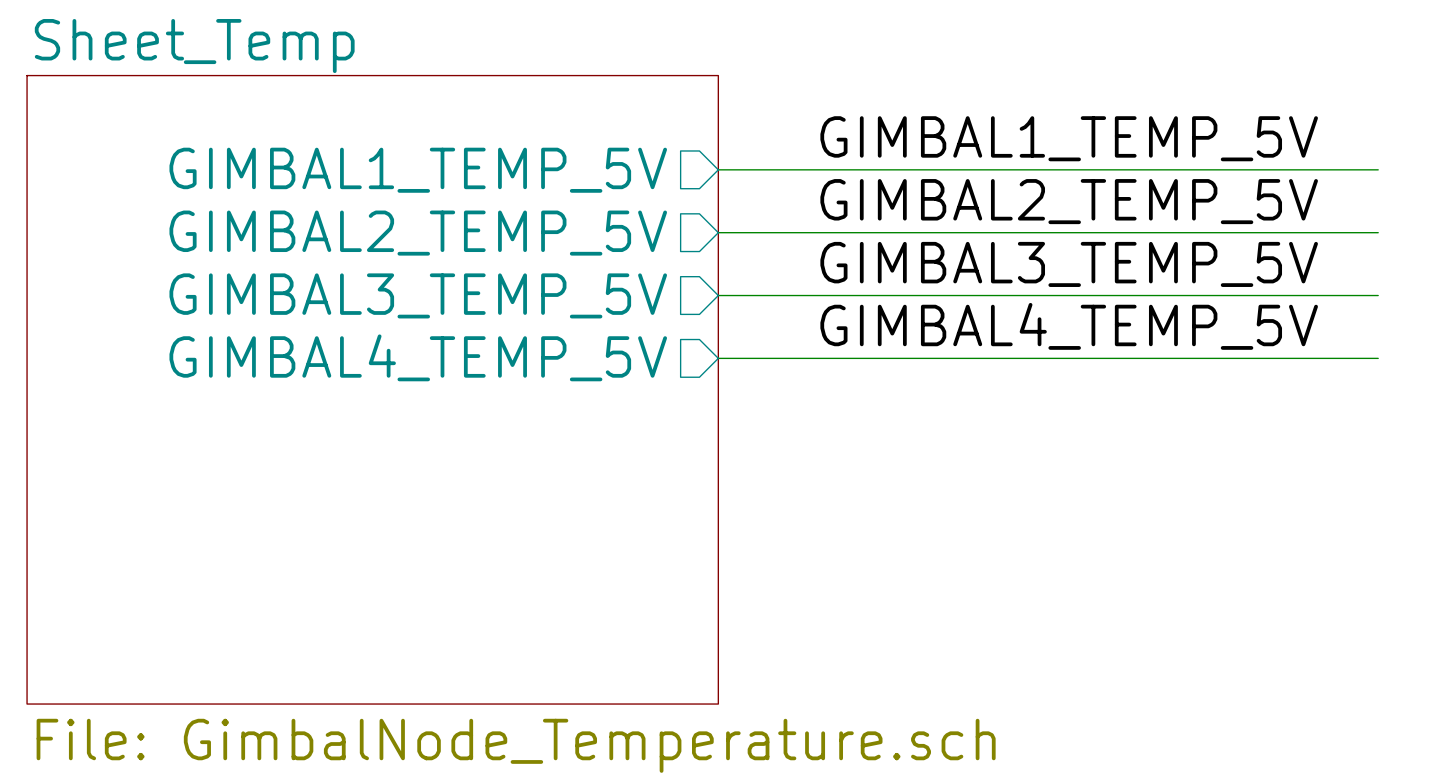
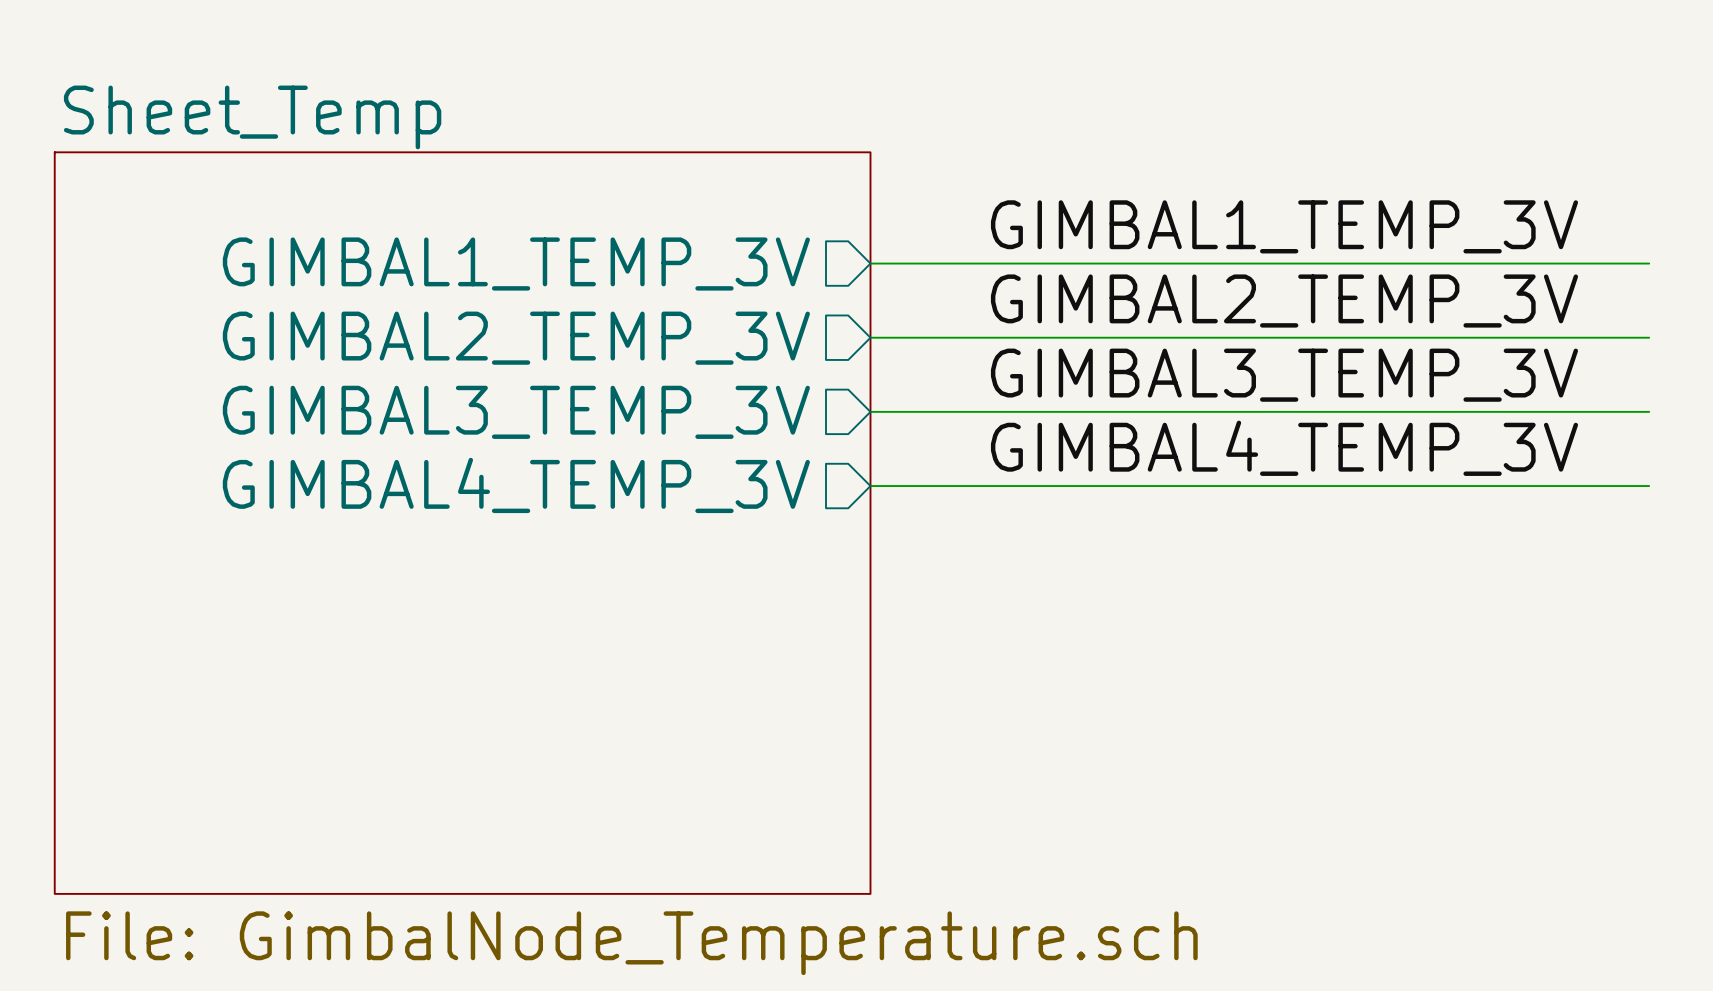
label: GIMBAL1_TEMP_5V (1069, 138) -> GIMBAL1_TEMP_3V (1284, 226)
sheet pin: GIMBAL1_TEMP_5V (418, 170) -> GIMBAL1_TEMP_3V (516, 264)
label: GIMBAL2_TEMP_5V (1069, 201) -> GIMBAL2_TEMP_3V (1284, 301)
sheet pin: GIMBAL2_TEMP_5V (418, 233) -> GIMBAL2_TEMP_3V (516, 338)
label: GIMBAL3_TEMP_5V (1069, 264) -> GIMBAL3_TEMP_3V (1284, 375)
sheet pin: GIMBAL3_TEMP_5V (418, 295) -> GIMBAL3_TEMP_3V (516, 412)
label: GIMBAL4_TEMP_5V (1069, 326) -> GIMBAL4_TEMP_3V (1284, 448)
sheet pin: GIMBAL4_TEMP_5V (418, 357) -> GIMBAL4_TEMP_3V (516, 485)

